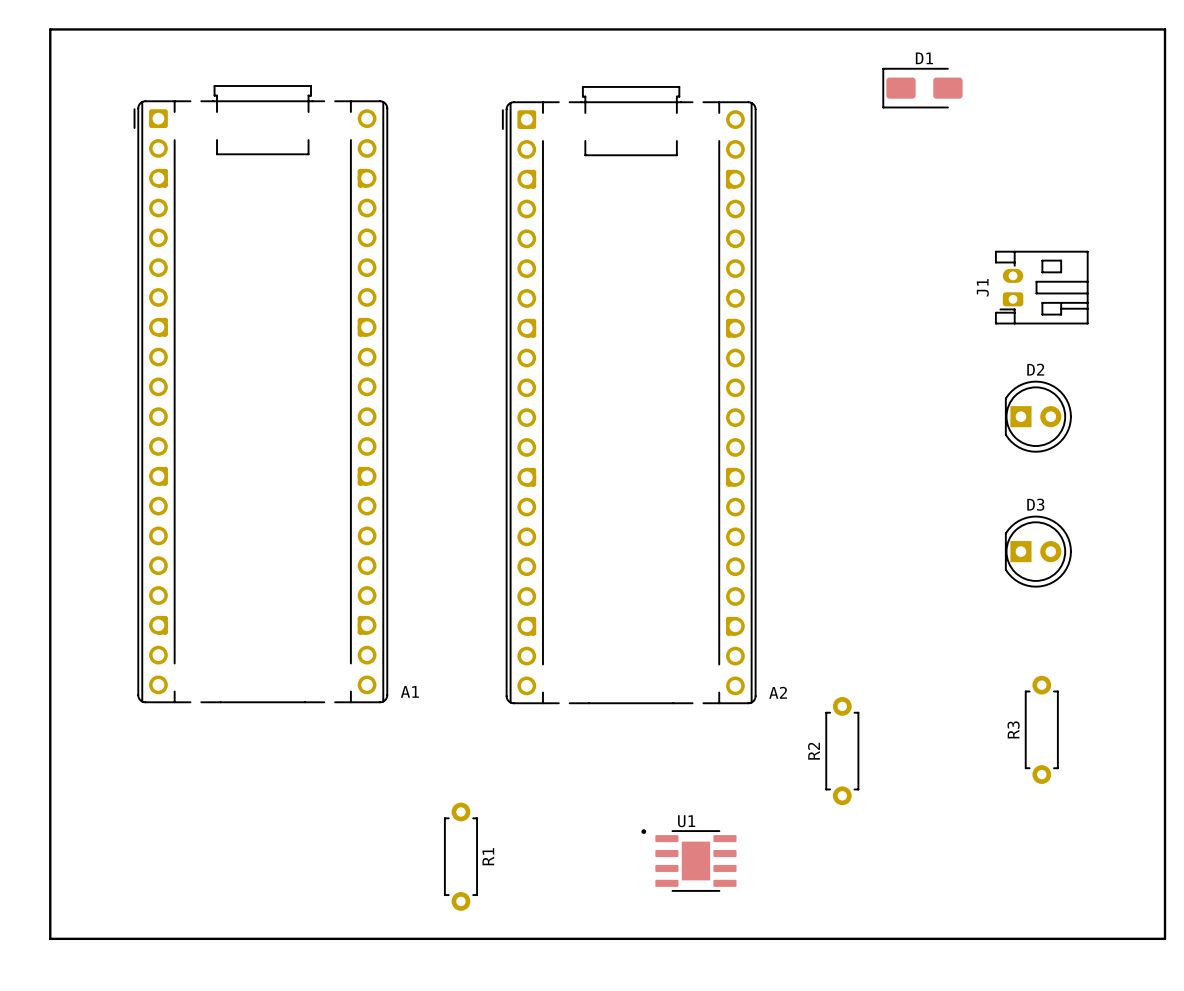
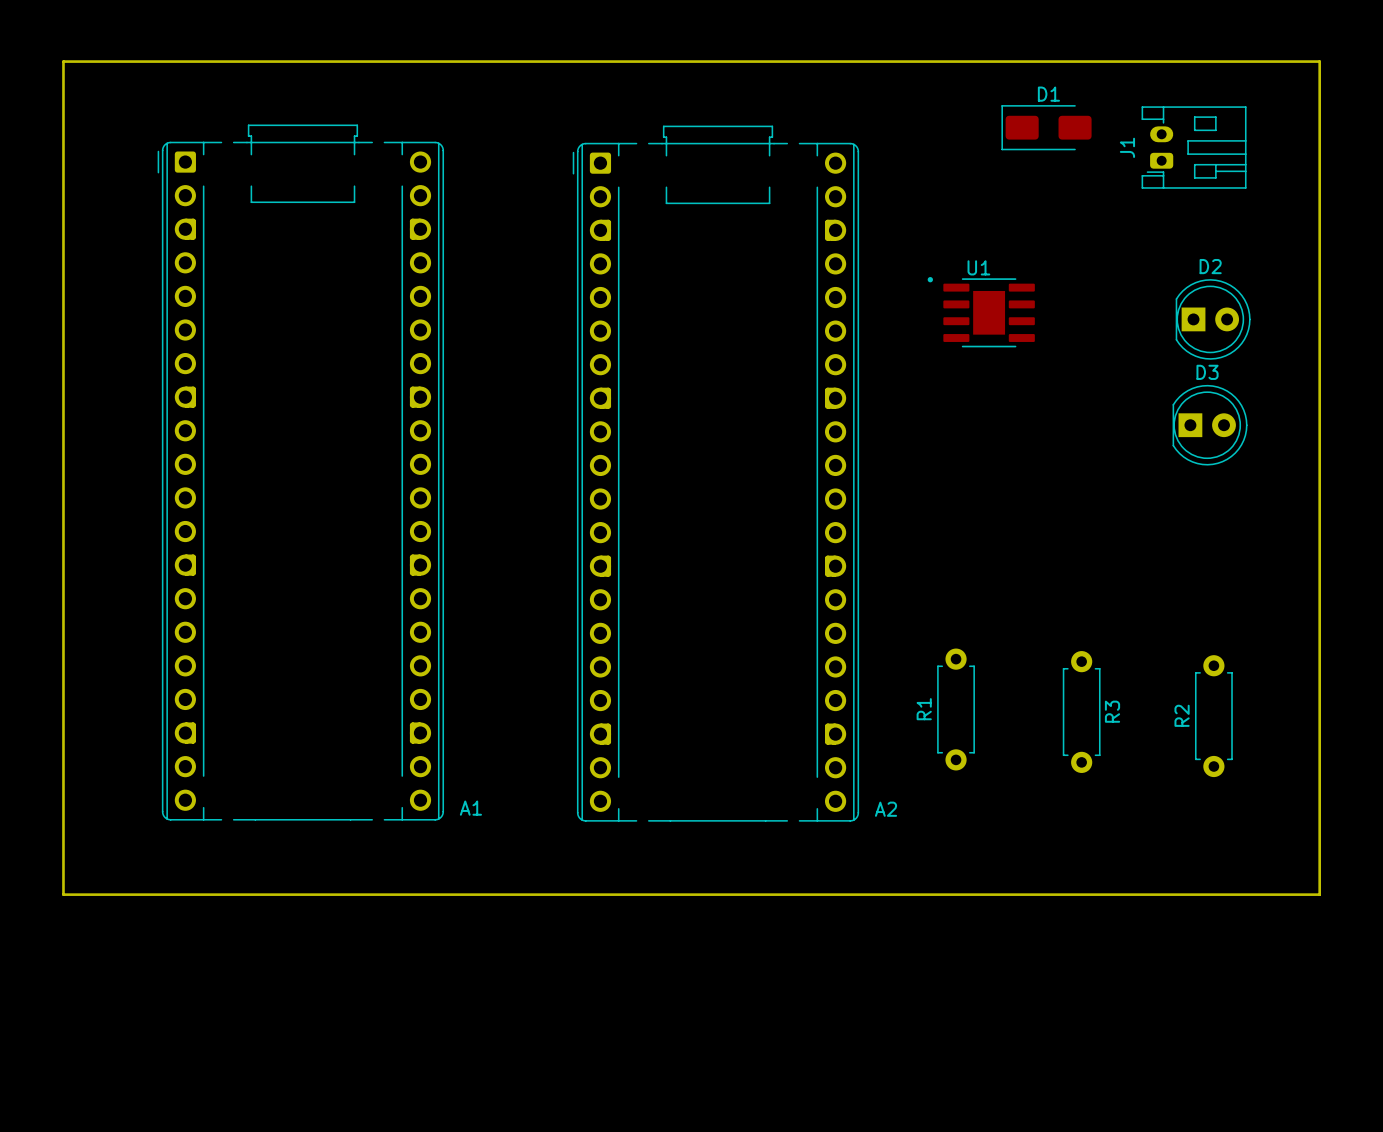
J1 position: (1041, 287) -> (1194, 147)
D2 position: (1038, 416) -> (1213, 319)
D3 position: (1038, 551) -> (1210, 425)
R3 name position: R3 (1013, 729) -> R3 (1112, 711)
R3 position: (1041, 729) -> (1081, 712)
R2 position: (842, 751) -> (1213, 716)
board edge: (50, 768) (50, 938) (1165, 938) (1165, 768) -> (63, 894) (1319, 894)
R1 position: (460, 856) -> (956, 709)
R1 name position: R1 (488, 856) -> R1 (924, 709)
U1 position: (688, 860) -> (981, 312)

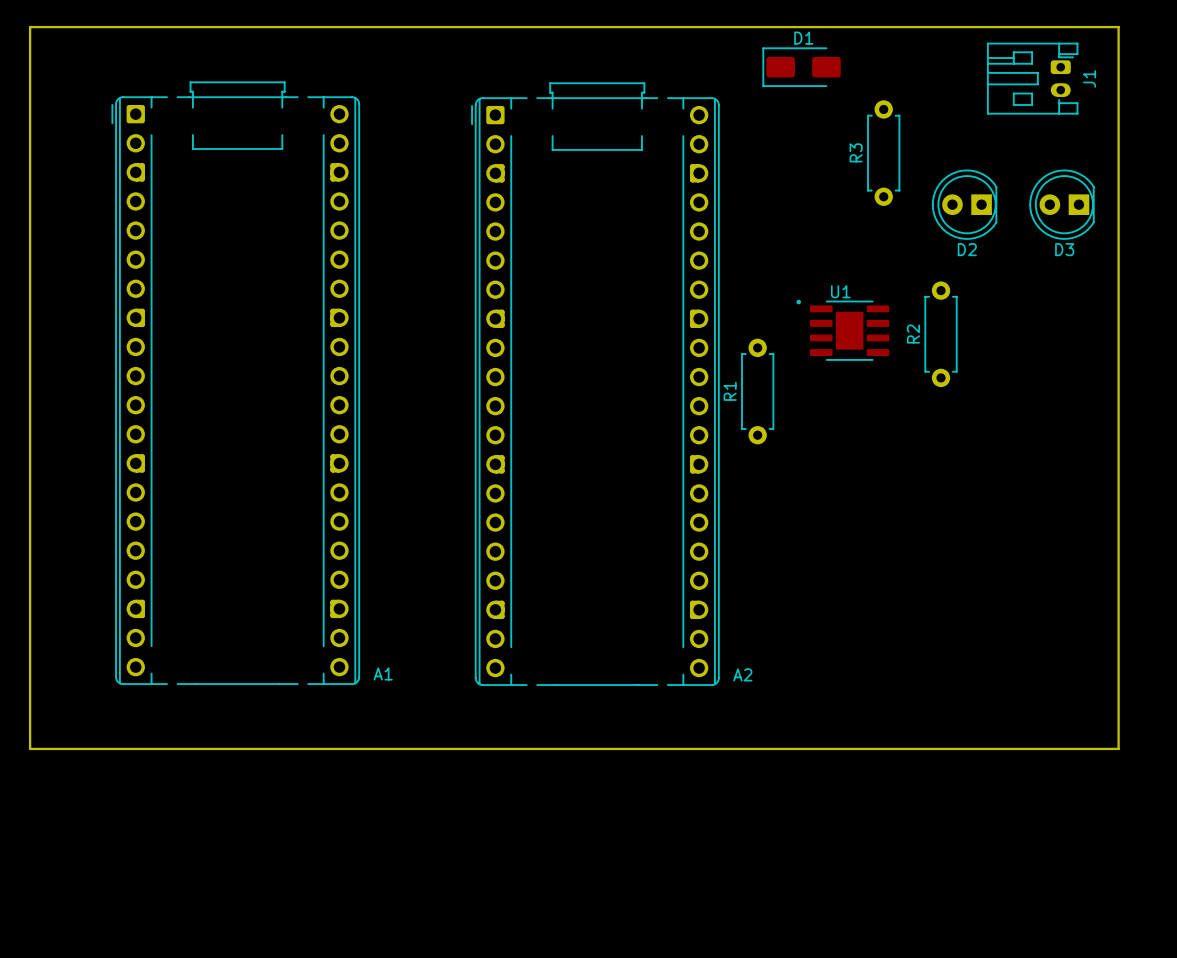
D1 position: (1046, 127) -> (801, 67)
J1 rotation: 0° (1194, 147) -> 180° (1032, 78)
U1 position: (981, 312) -> (842, 330)
D2 rotation: 0° (1213, 319) -> 180° (964, 204)
D2 position: (1213, 319) -> (964, 204)
D3 rotation: 0° (1210, 425) -> 180° (1061, 204)
D3 position: (1210, 425) -> (1061, 204)
R1 position: (956, 709) -> (757, 391)
R3 name position: R3 (1112, 711) -> R3 (856, 152)
R3 position: (1081, 712) -> (883, 153)
R2 position: (1213, 716) -> (941, 334)

